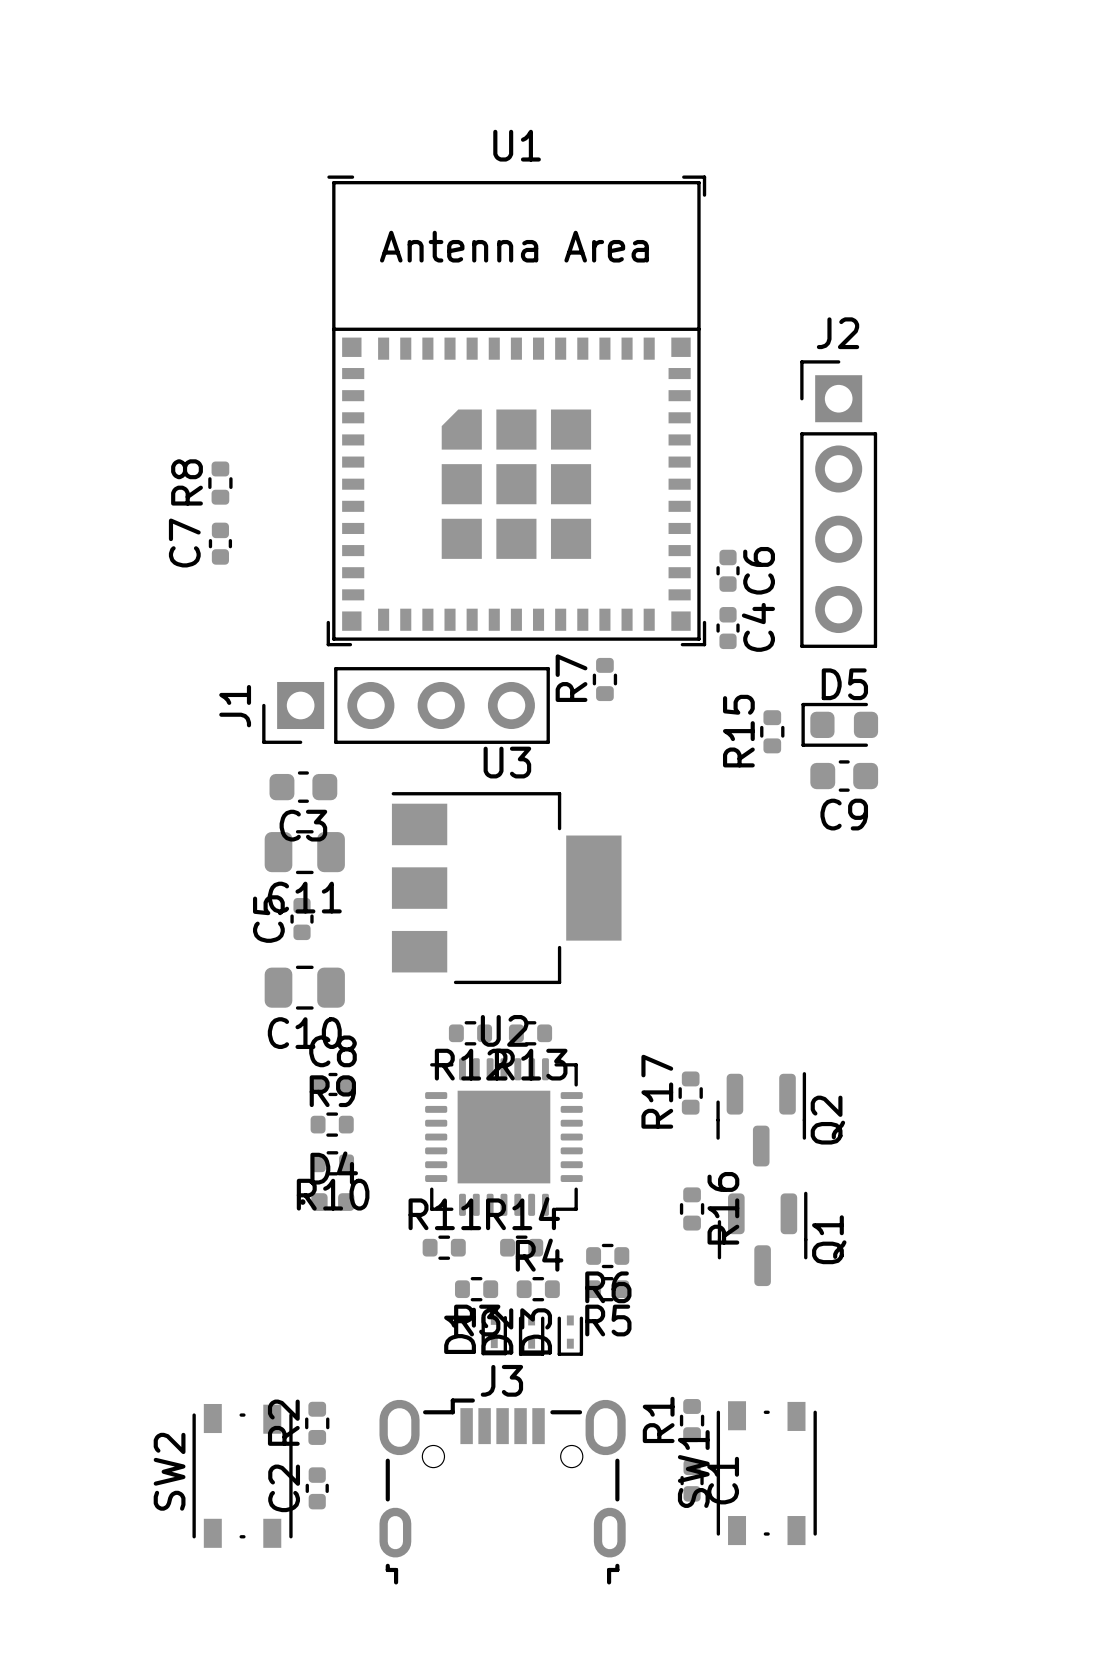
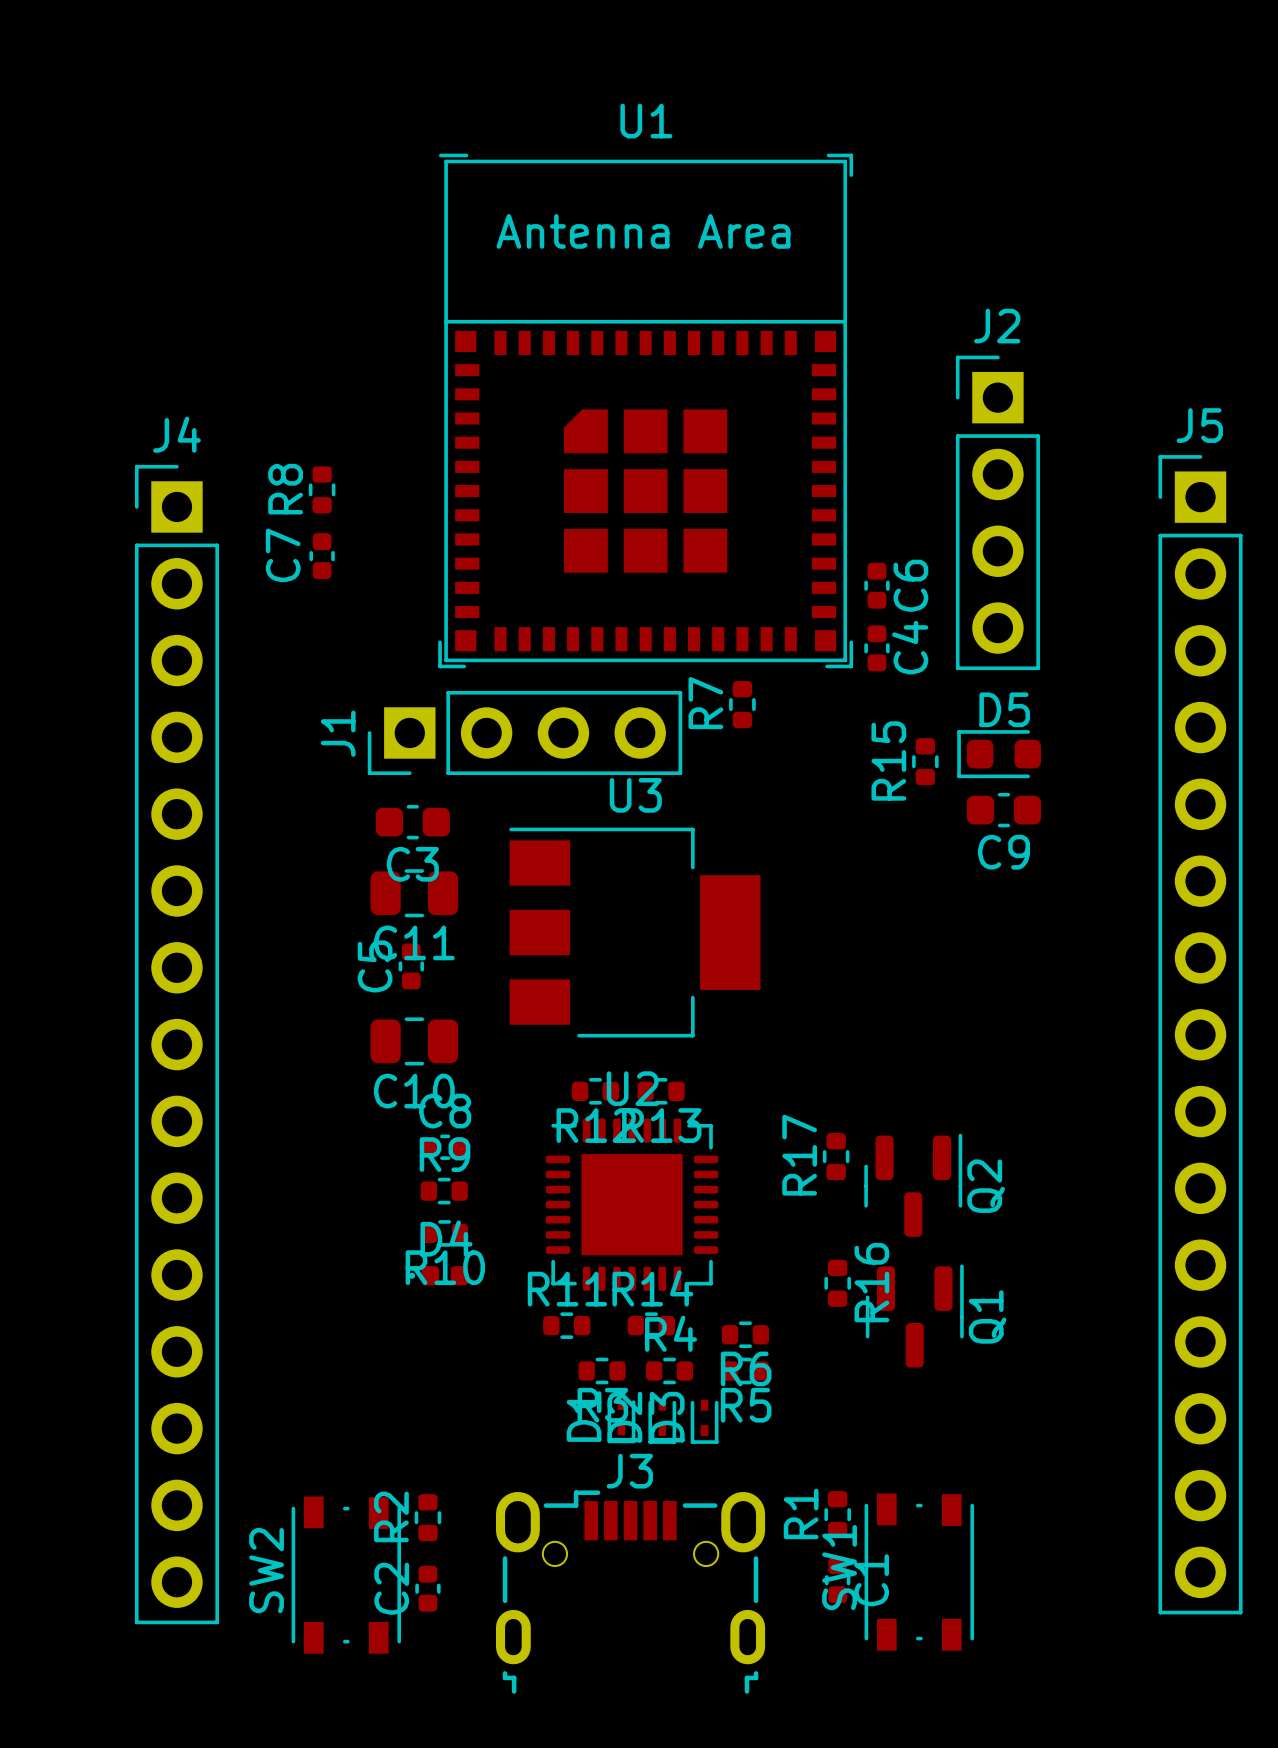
J5: none -> (1200, 1034)
J4: none -> (176, 1044)

